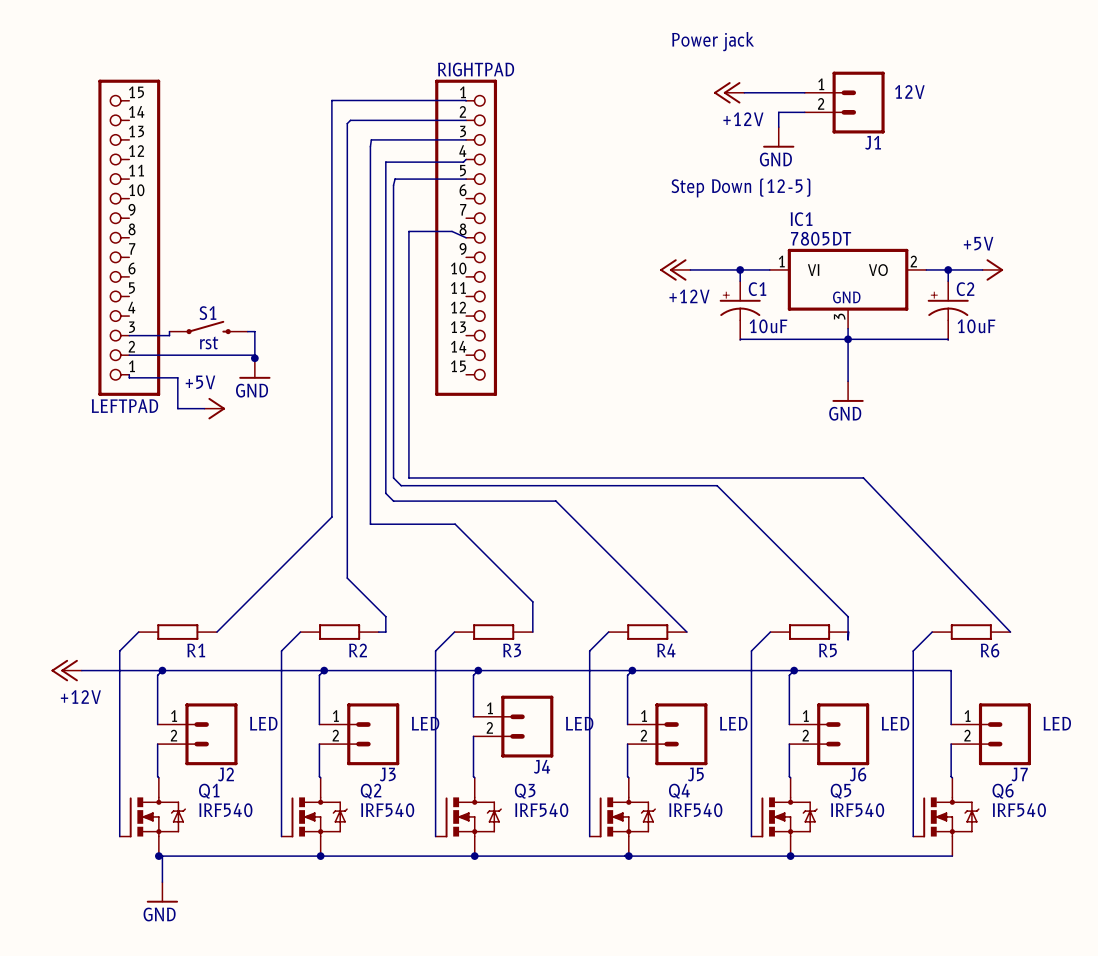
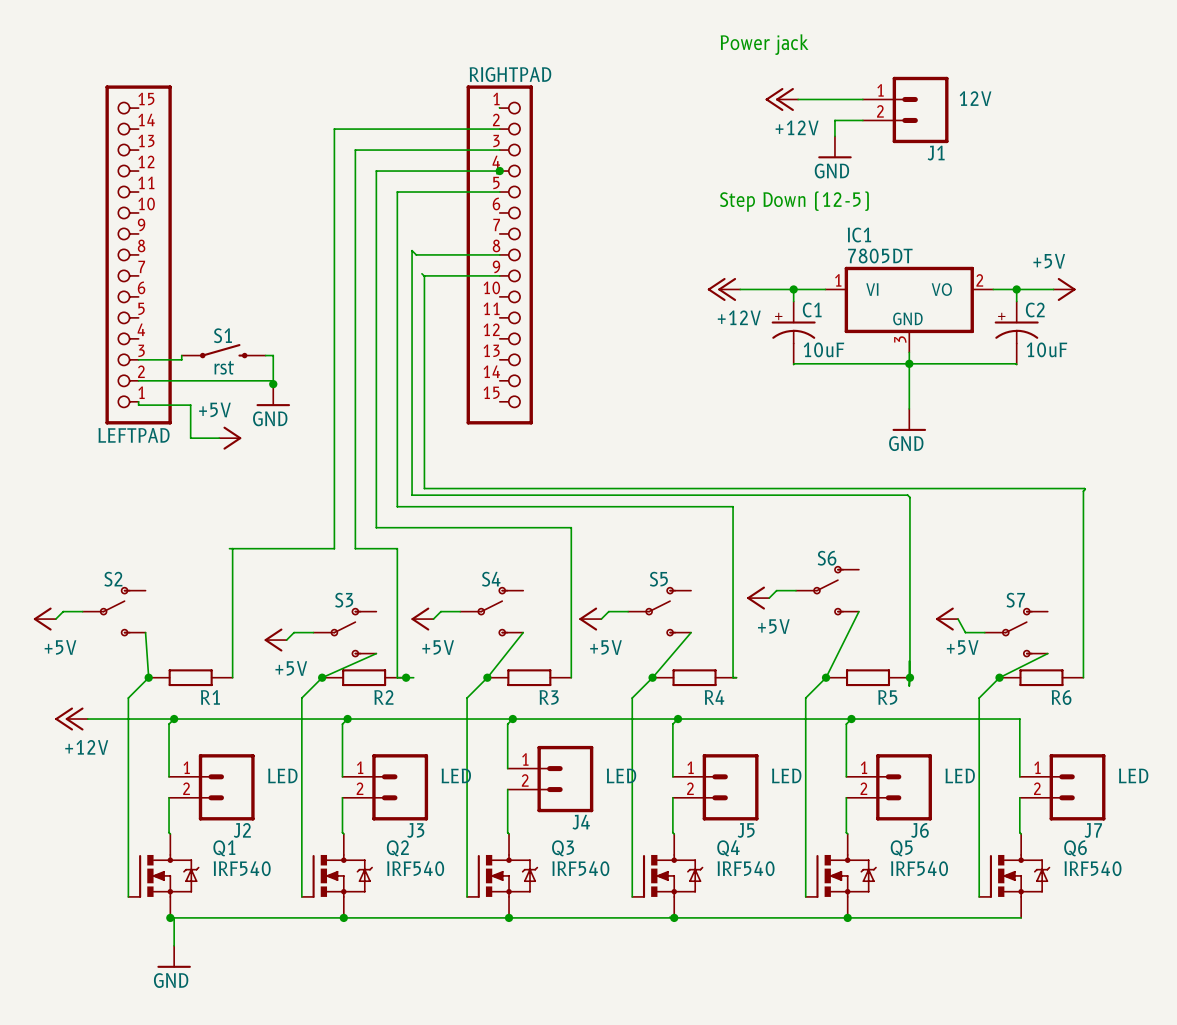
wire: (465, 100) (331, 100) (331, 517) (216, 632) -> (232, 548) (232, 677)
wire: (350, 120) (347, 123) (347, 578) (385, 616) (385, 632) -> (375, 129) (334, 129) (334, 548) (229, 548)
wire: (371, 139) (370, 524) (455, 524) (532, 601) -> (499, 171) (376, 171) (376, 527) (571, 527) (571, 645)
wire: none -> (398, 150) (355, 150) (355, 548) (397, 548) (397, 677) (406, 677)
junction: none -> (499, 171)
wire: (463, 162) (385, 162) (385, 493) (393, 501) (555, 501) (686, 632) -> (423, 192) (397, 192) (397, 506) (733, 506) (733, 677) (736, 677)
wire: (395, 179) (393, 185) (393, 477) (401, 485) (717, 485) (848, 616) -> none
wire: (466, 237) (452, 231) (408, 231) (408, 477) (863, 477) (1010, 632) -> (421, 273) (424, 276) (424, 488) (1084, 488) (1083, 677)
wire: none -> (499, 254) (416, 254) (412, 250) (412, 495) (907, 495) (909, 497) (909, 677)
wire: none -> (424, 275) (499, 275)
wire: none -> (795, 590) (776, 590) (769, 598)
S6: none -> (827, 590)
power symbol: none -> +5V (758, 598)
wire: none -> (82, 611) (63, 611) (55, 619)
S2: none -> (114, 611)
wire: none -> (460, 611) (440, 611) (433, 619)
S4: none -> (491, 611)
wire: none -> (628, 611) (608, 611) (601, 619)
S5: none -> (659, 611)
wire: none -> (858, 611) (826, 677)
power symbol: none -> +5V (44, 619)
power symbol: none -> +5V (422, 619)
power symbol: none -> +5V (590, 619)
power symbol: none -> +5V (947, 619)
wire: none -> (958, 619) (965, 632) (984, 632)
wire: none -> (145, 632) (148, 677)
wire: none -> (313, 632) (294, 632) (286, 640)
S3: none -> (344, 632)
wire: none -> (523, 632) (487, 677)
wire: none -> (691, 632) (652, 677)
S7: none -> (1016, 632)
power symbol: none -> +5V (275, 640)
wire: none -> (376, 653) (322, 677)
wire: none -> (1047, 653) (999, 677)
junction: none -> (148, 677)
junction: none -> (322, 677)
junction: none -> (406, 677)
junction: none -> (487, 677)
junction: none -> (652, 677)
junction: none -> (826, 677)
junction: none -> (909, 677)
junction: none -> (999, 677)

